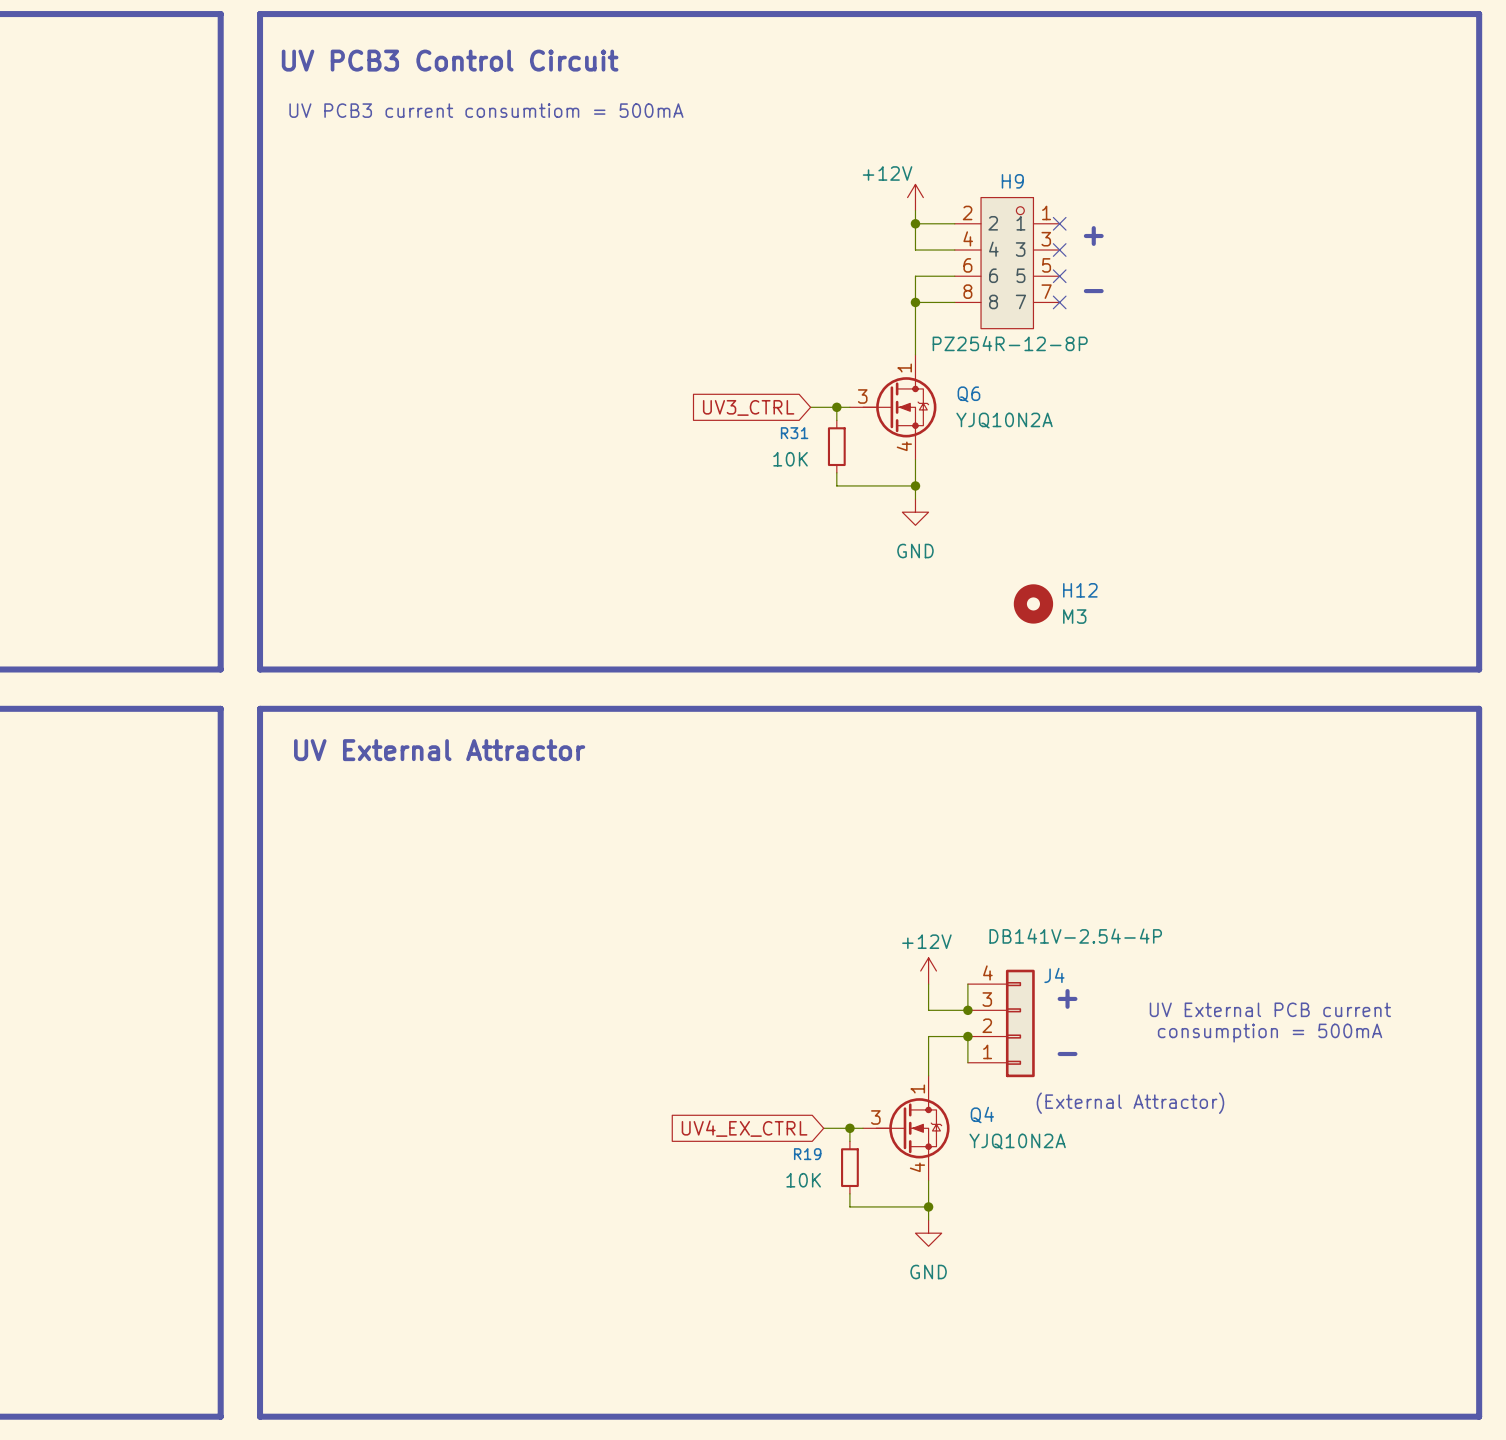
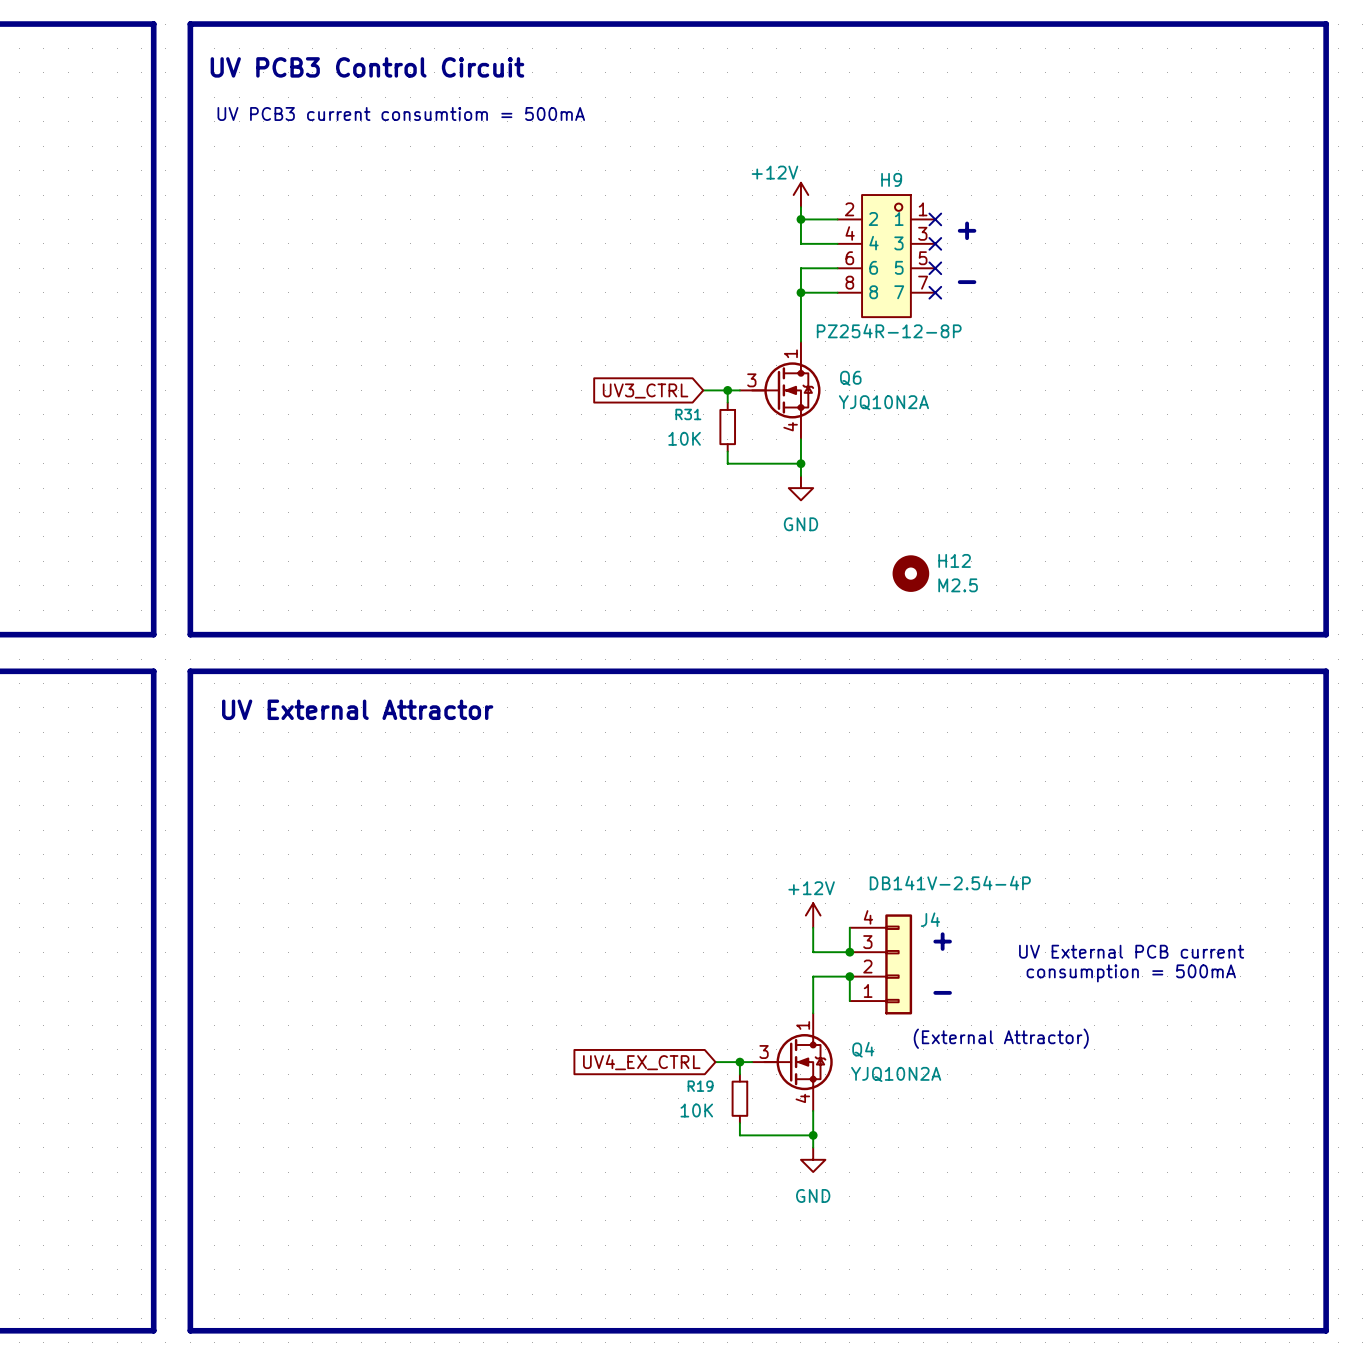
H12 value: M3 (1074, 616) -> M2.5 (958, 585)

